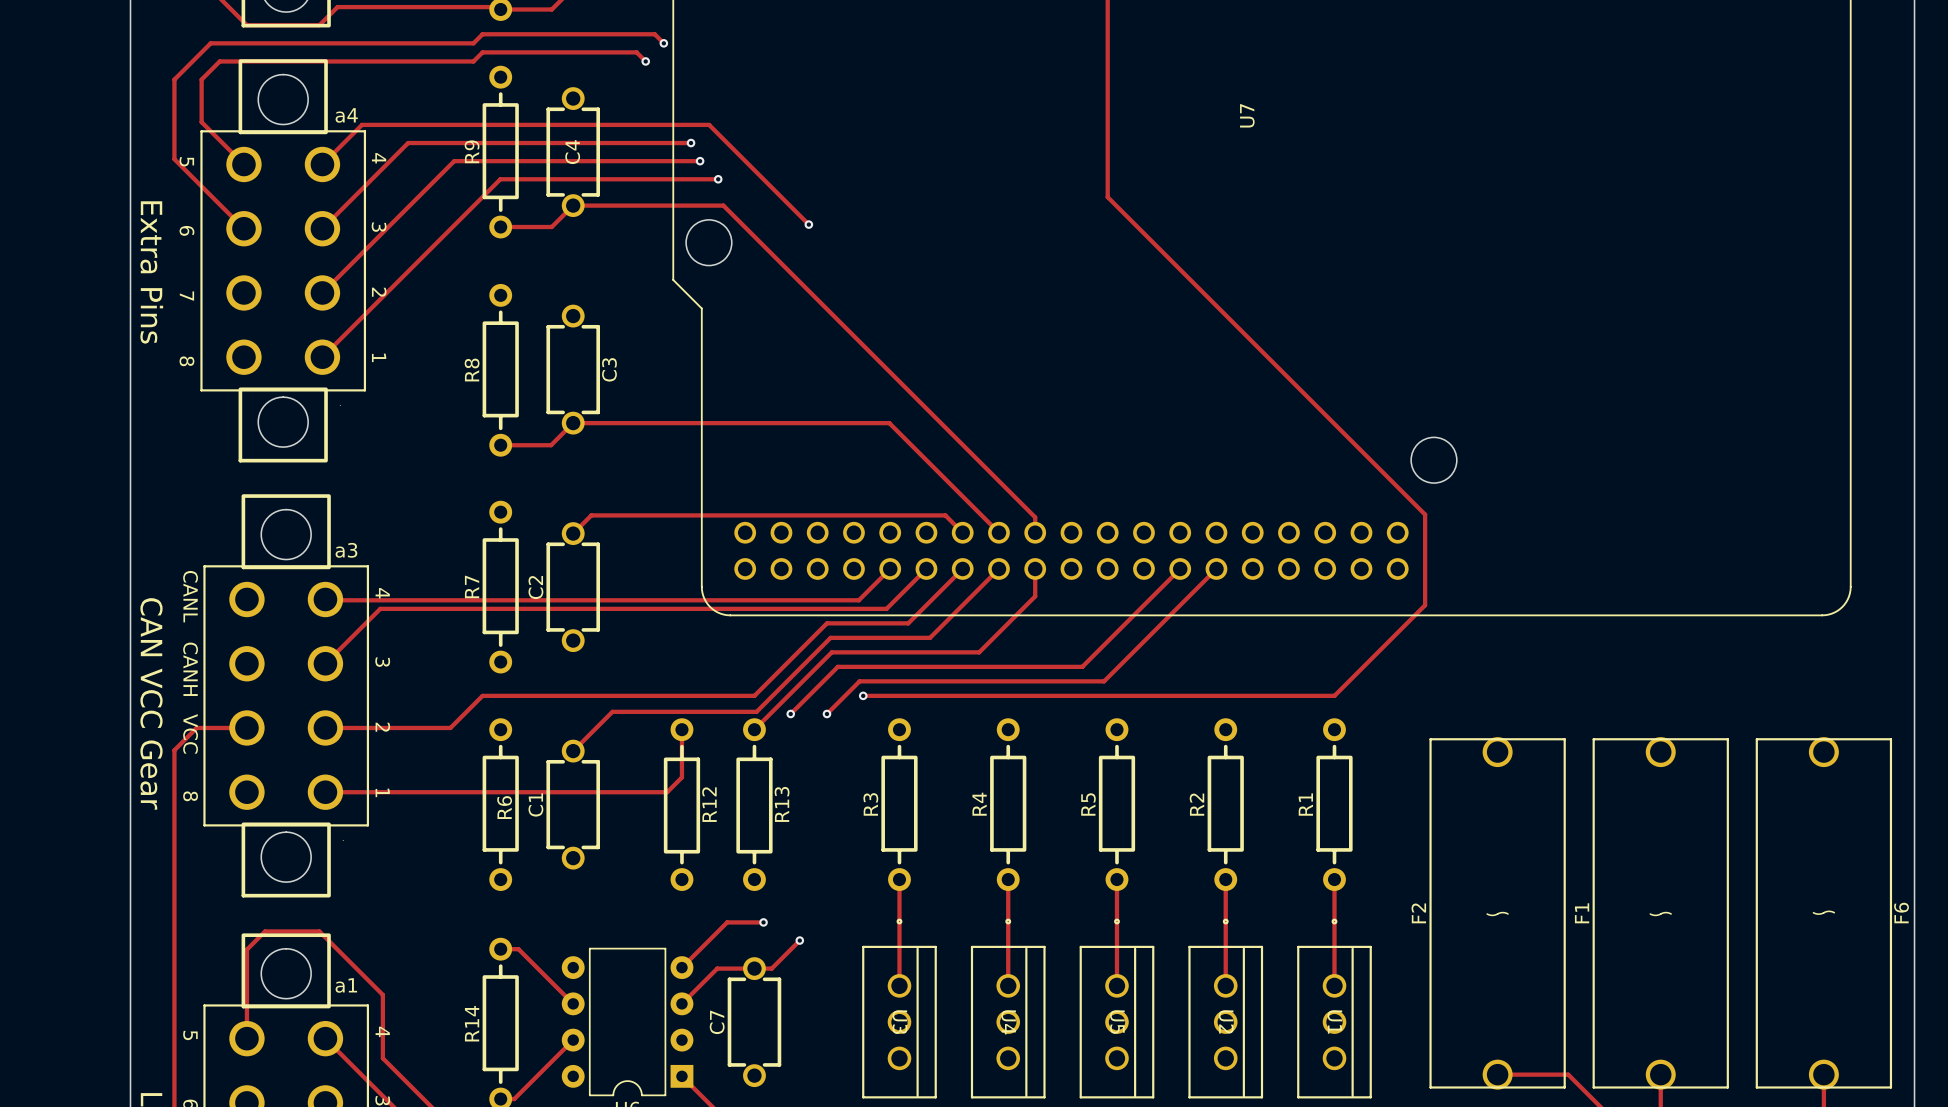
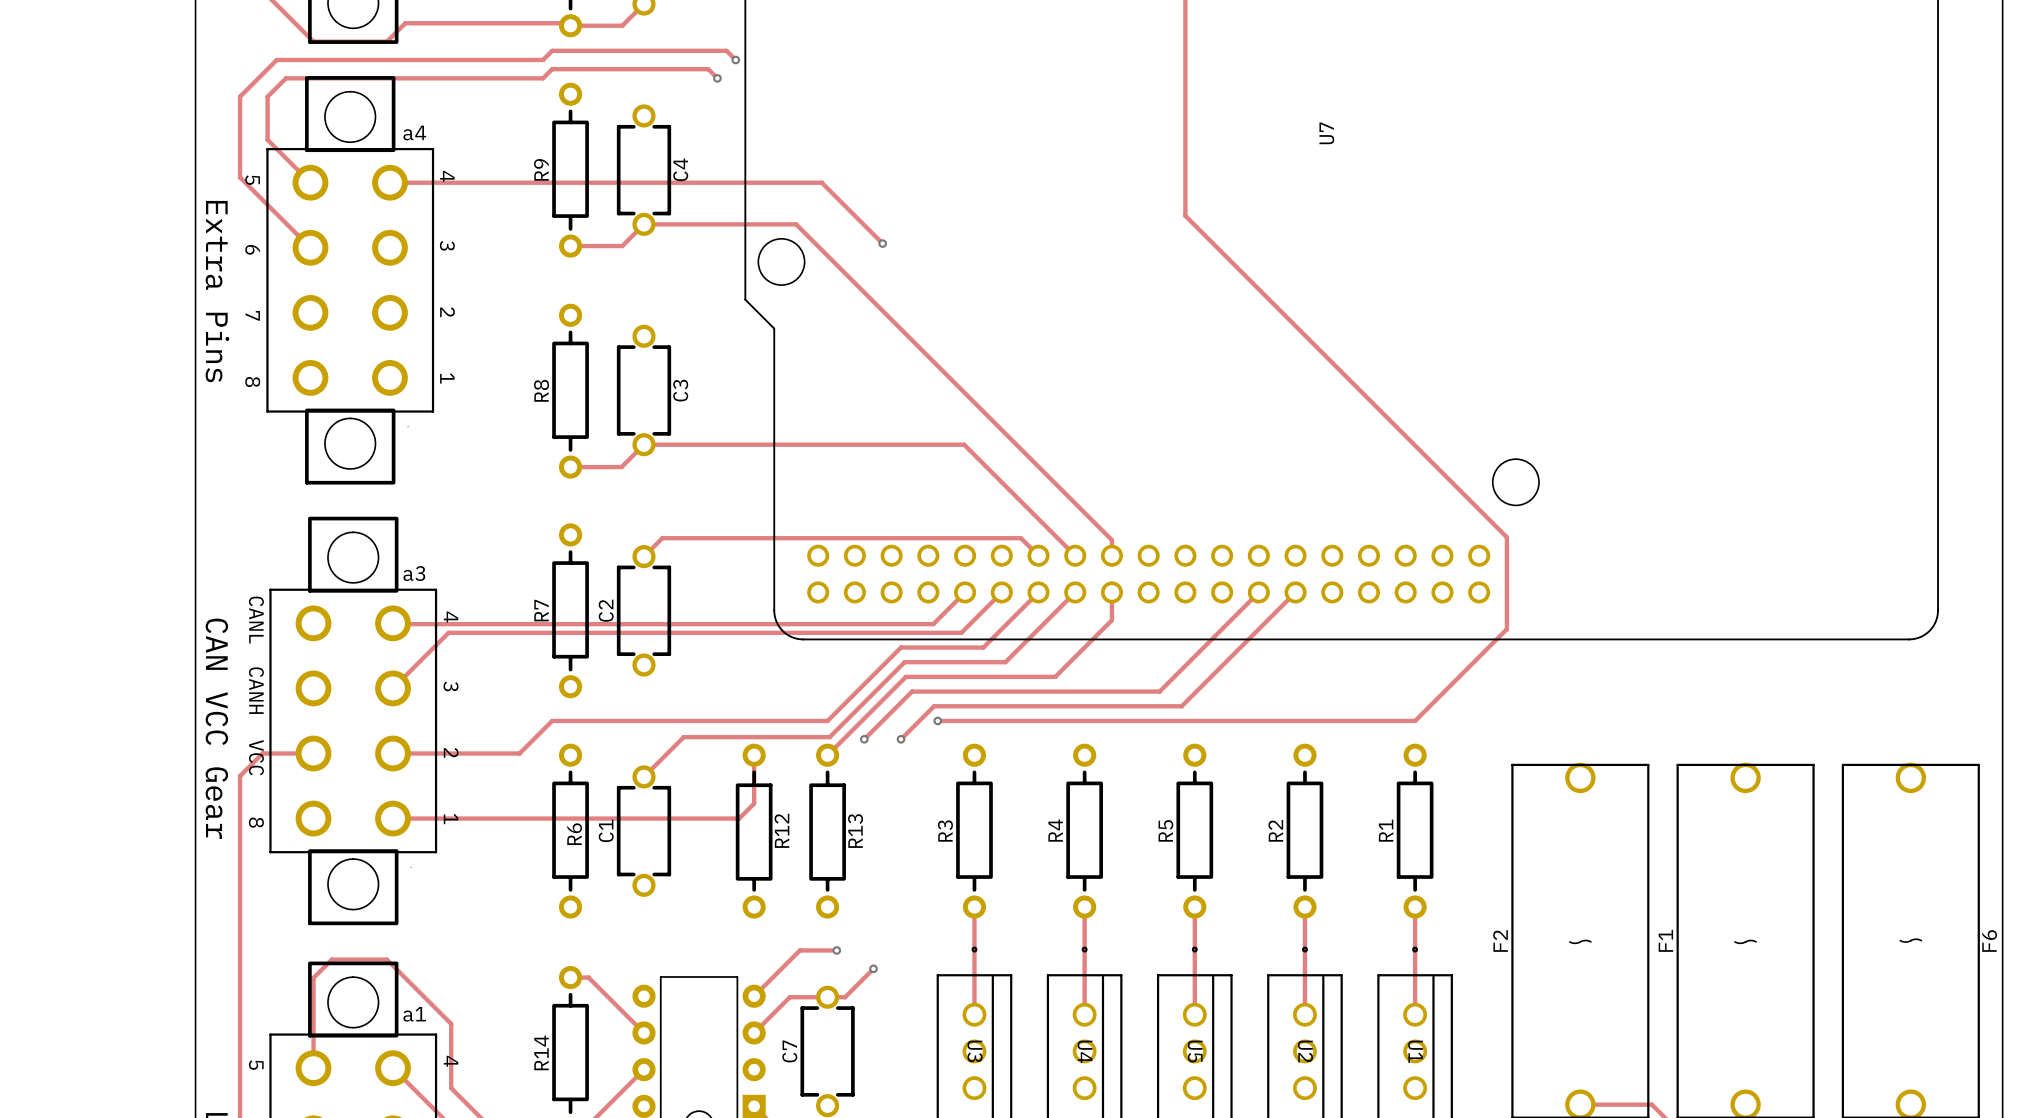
track: (691, 143) (408, 143) (322, 228) -> none
via: (691, 143) -> none
C4 name position: C4 (572, 152) -> C4 (680, 169)
track: (700, 161) (454, 161) (322, 292) -> none
via: (700, 161) -> none
track: (322, 164) (362, 124) (709, 124) (748, 164) -> (389, 182) (821, 182)
track: (718, 179) (500, 179) (322, 357) -> none
via: (718, 179) -> none

